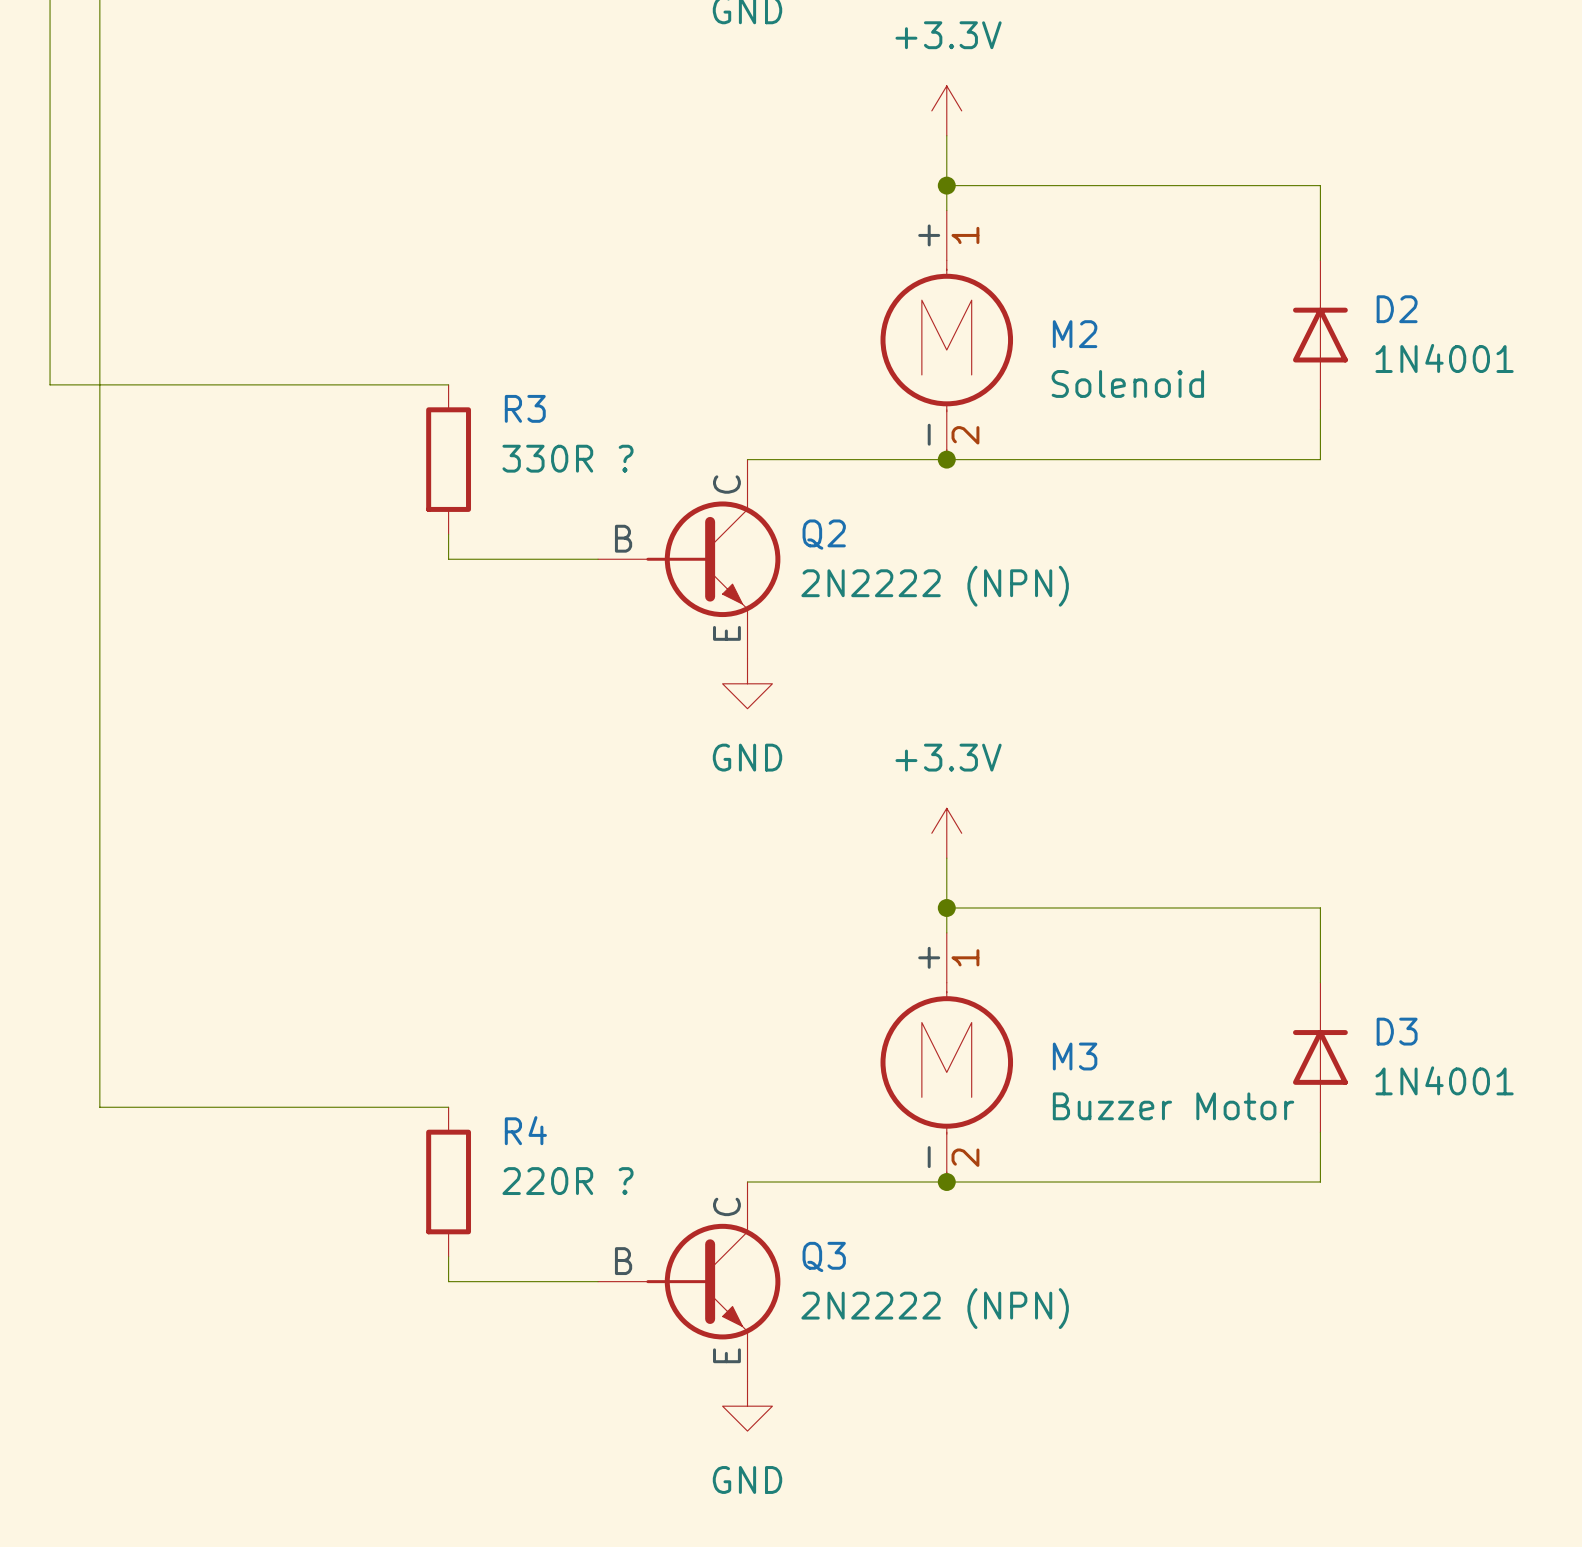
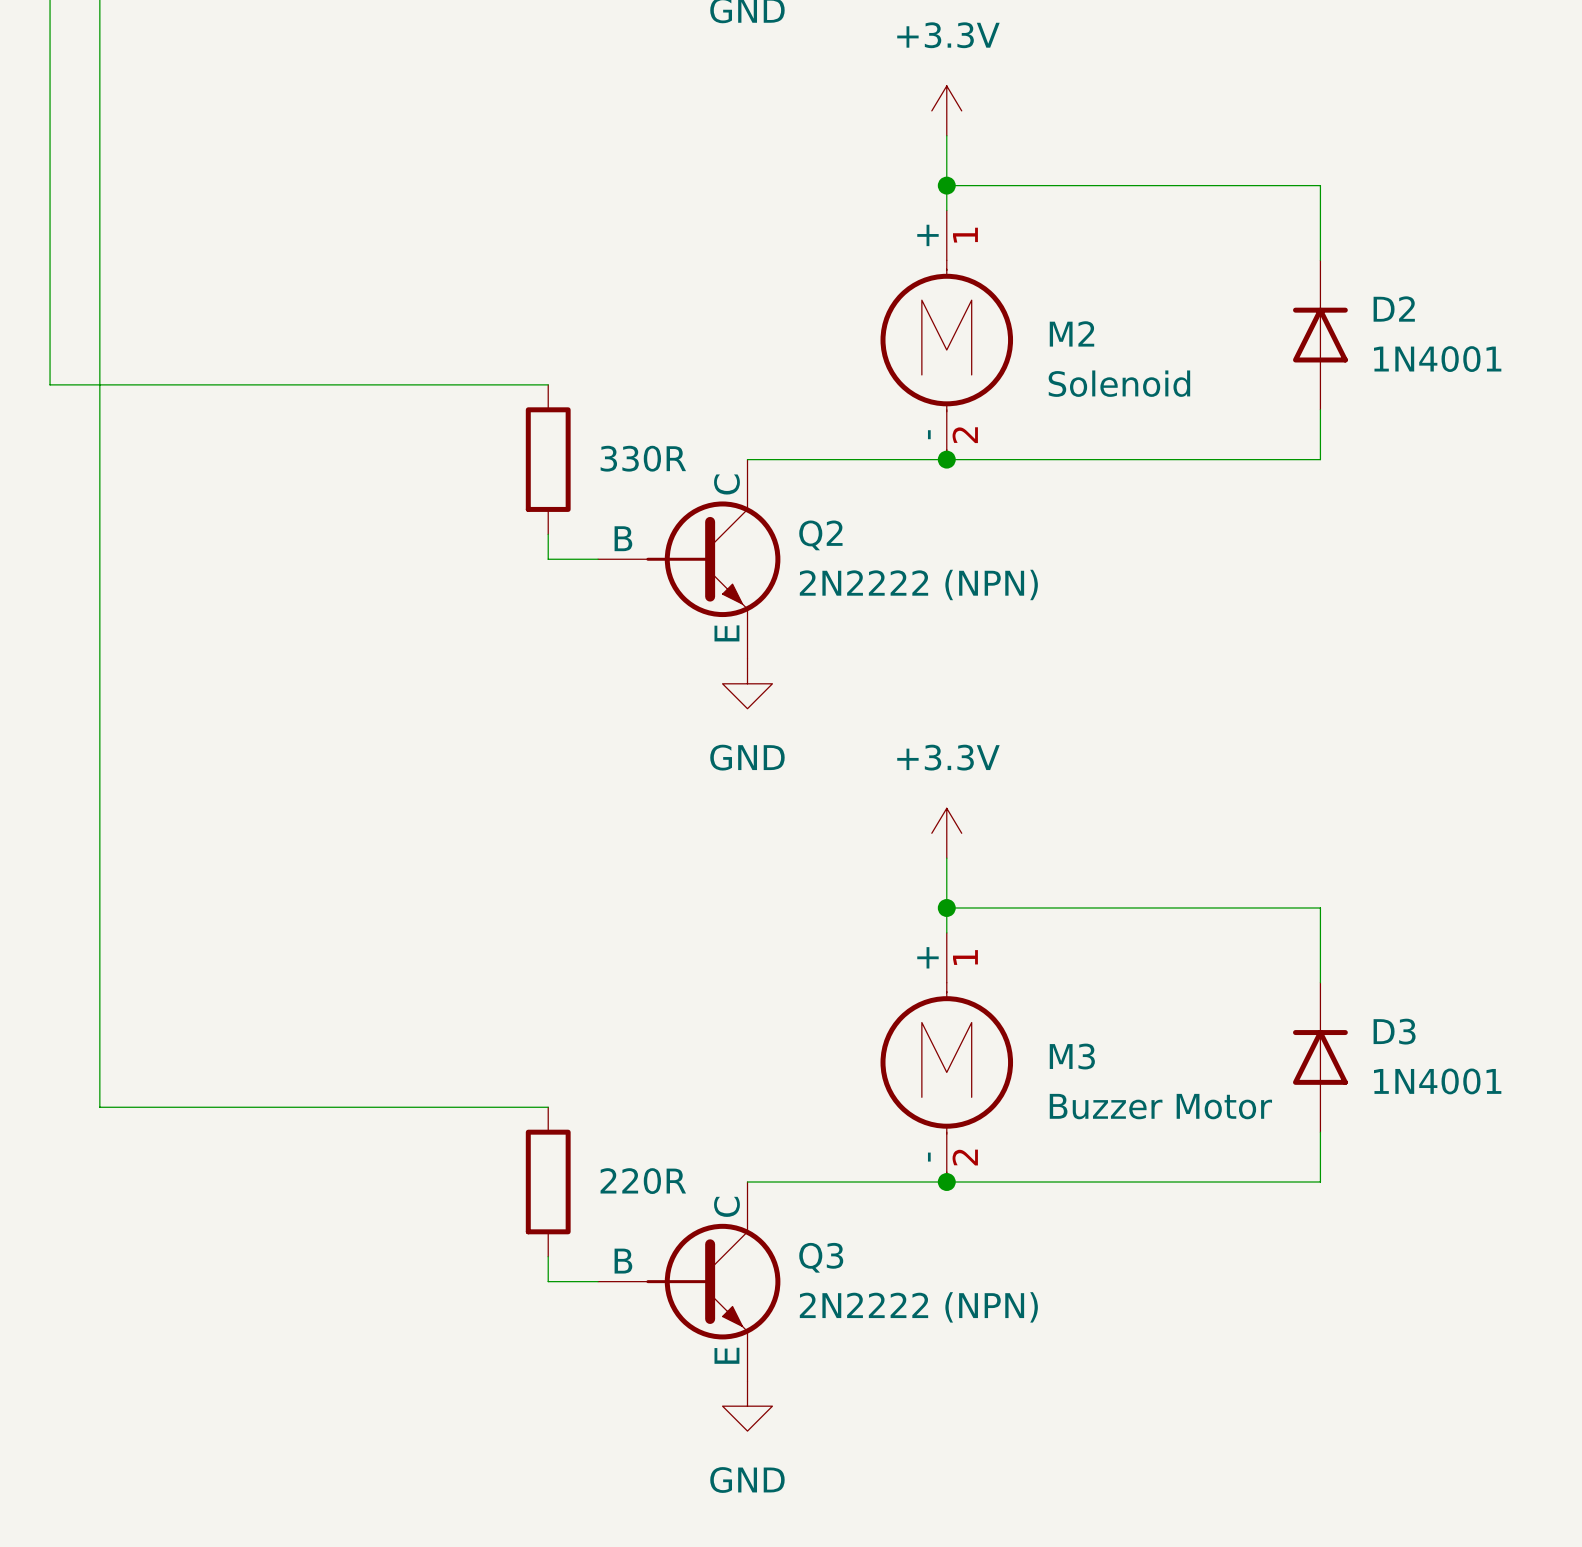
wire: none -> (448, 384) (548, 384)
R3: 330R ? (448, 459) -> none
part: none -> 330R (548, 459)
wire: (448, 534) (448, 559) (548, 559) -> (548, 534) (548, 559)
wire: none -> (448, 1107) (548, 1107)
R4: 220R ? (448, 1182) -> none
part: none -> 220R (548, 1182)
wire: (448, 1256) (448, 1281) (548, 1281) -> (548, 1256) (548, 1281)

